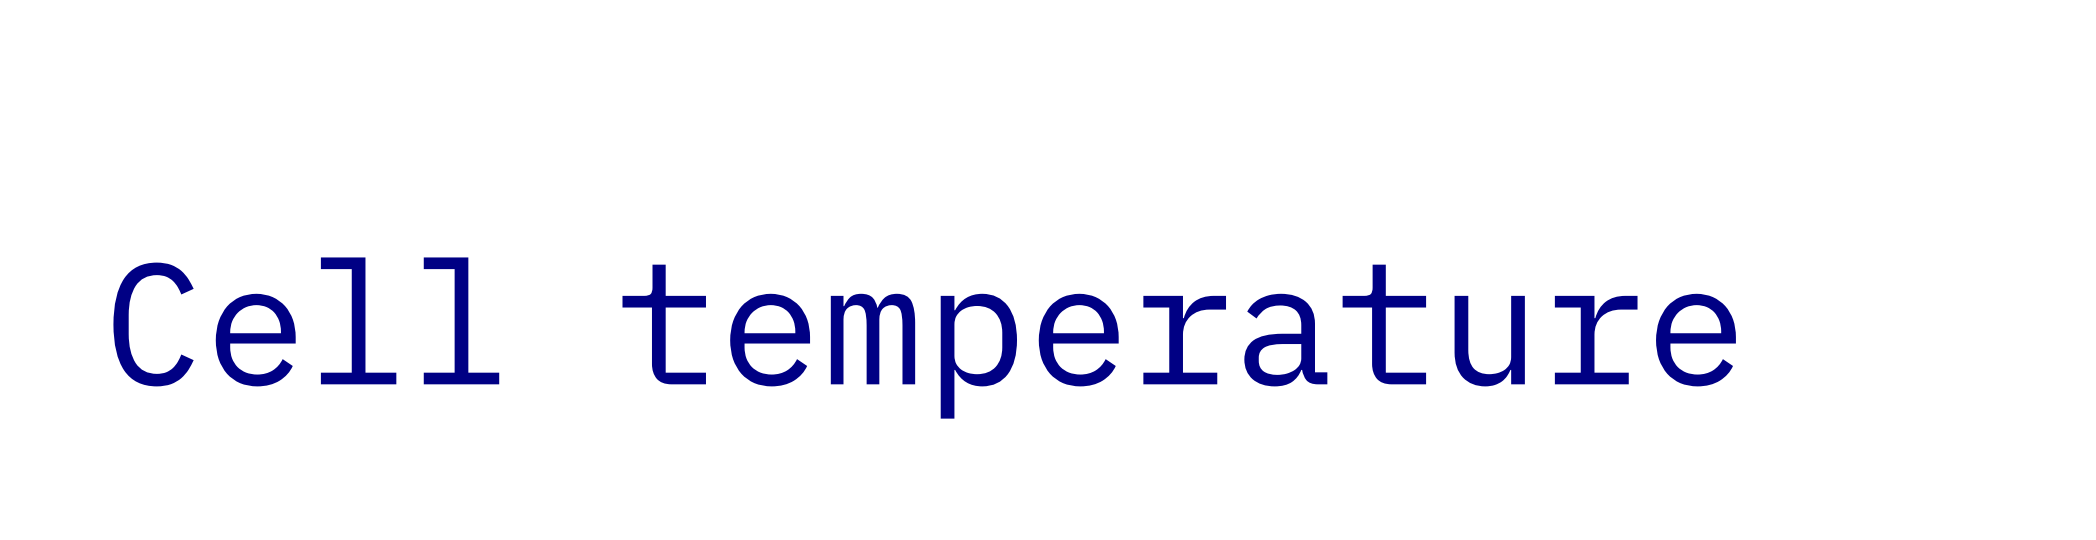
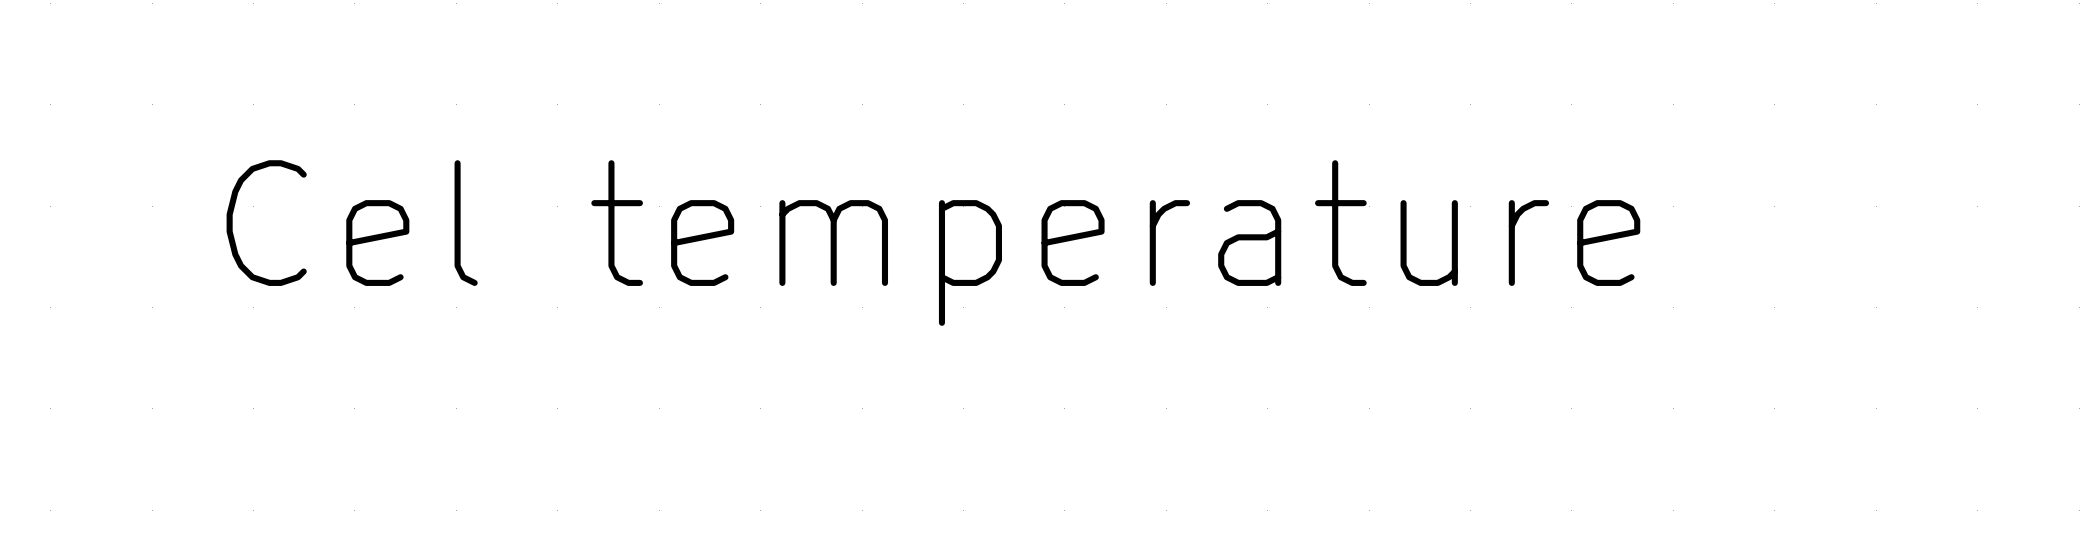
text: Cell temperature (924, 338) -> Cel temperature (933, 243)

